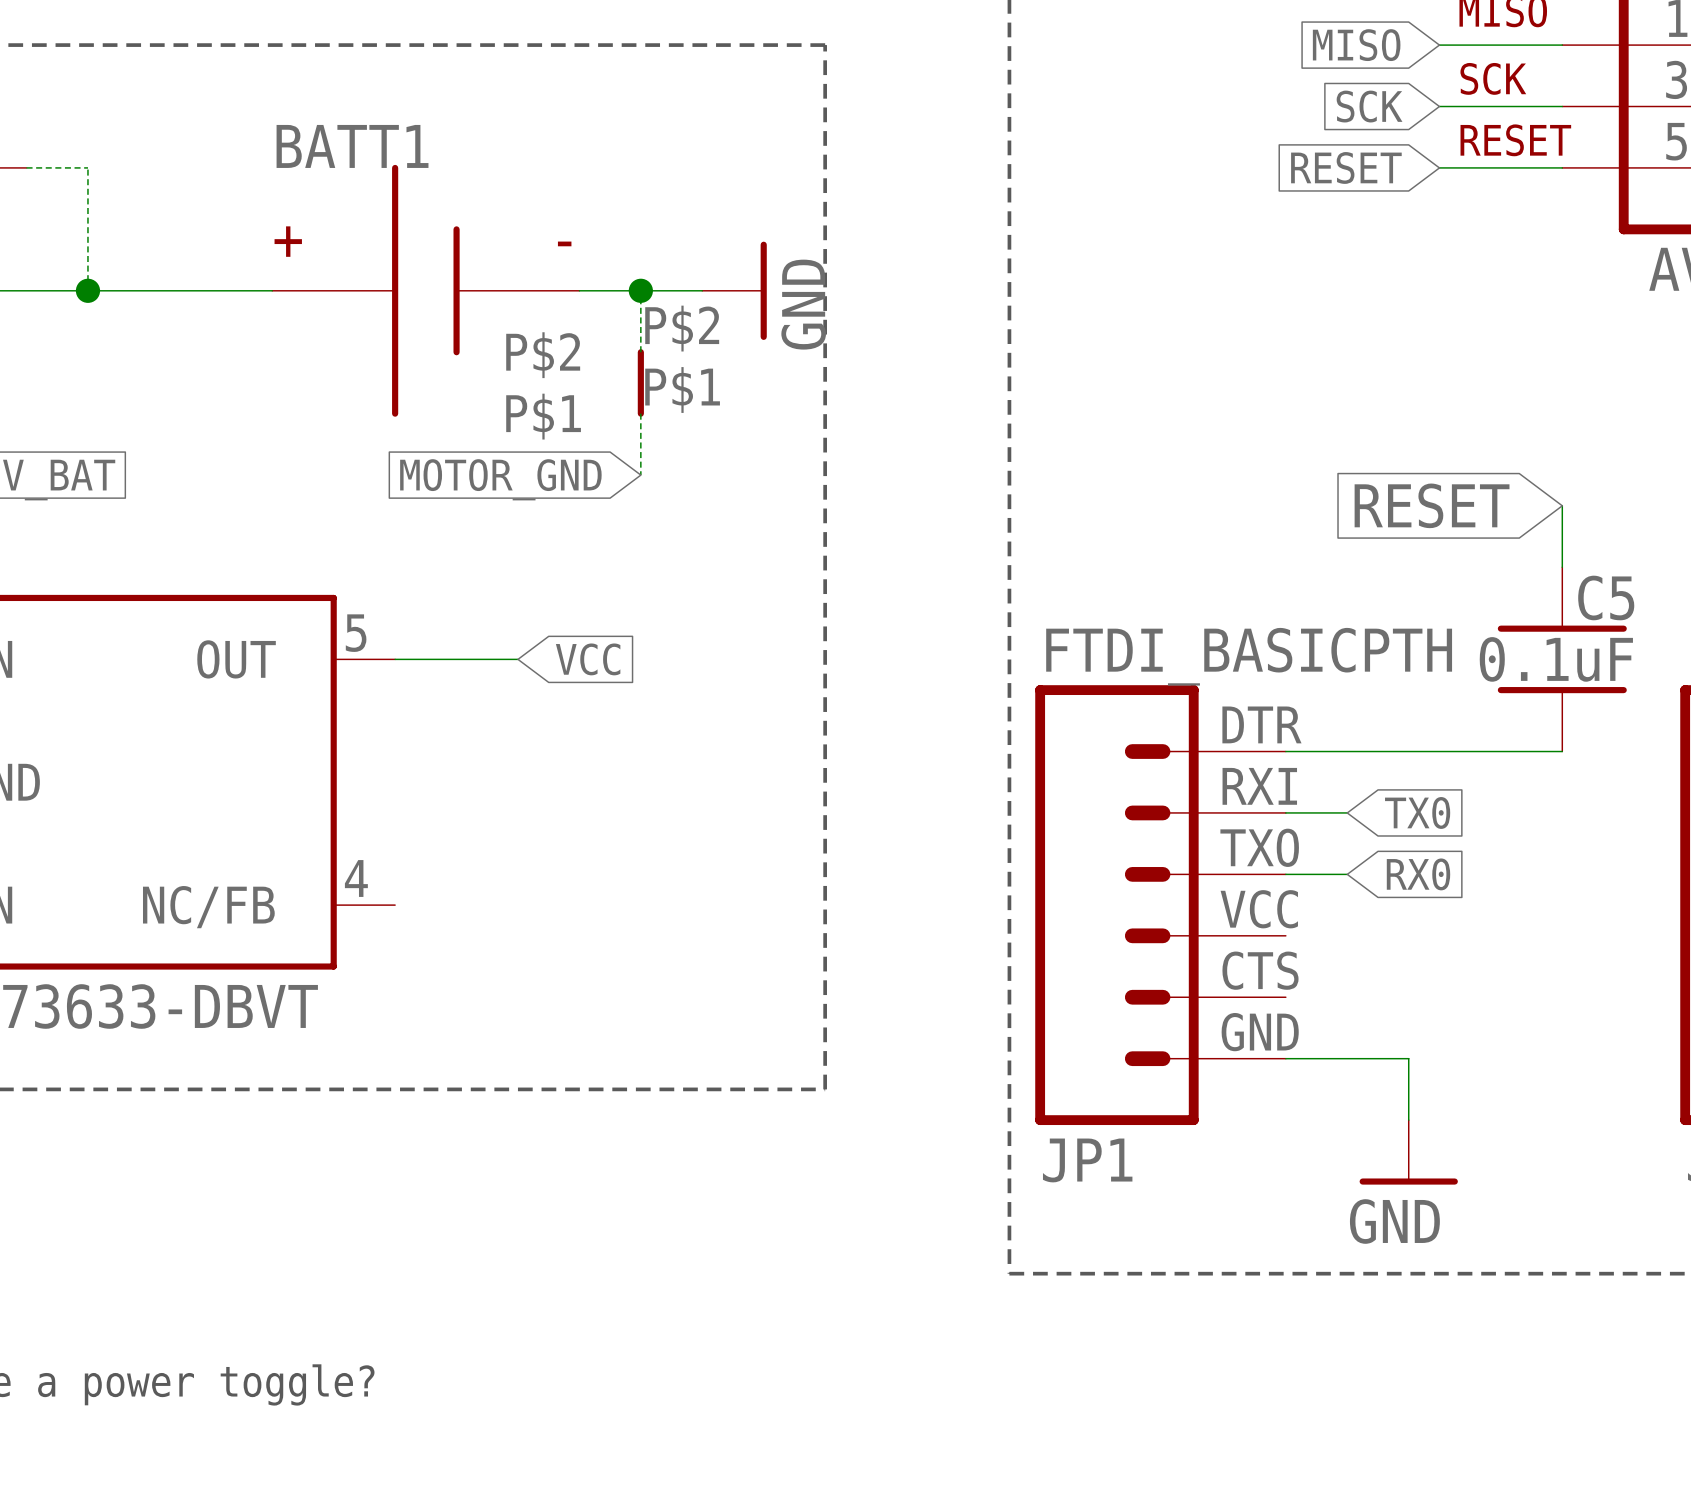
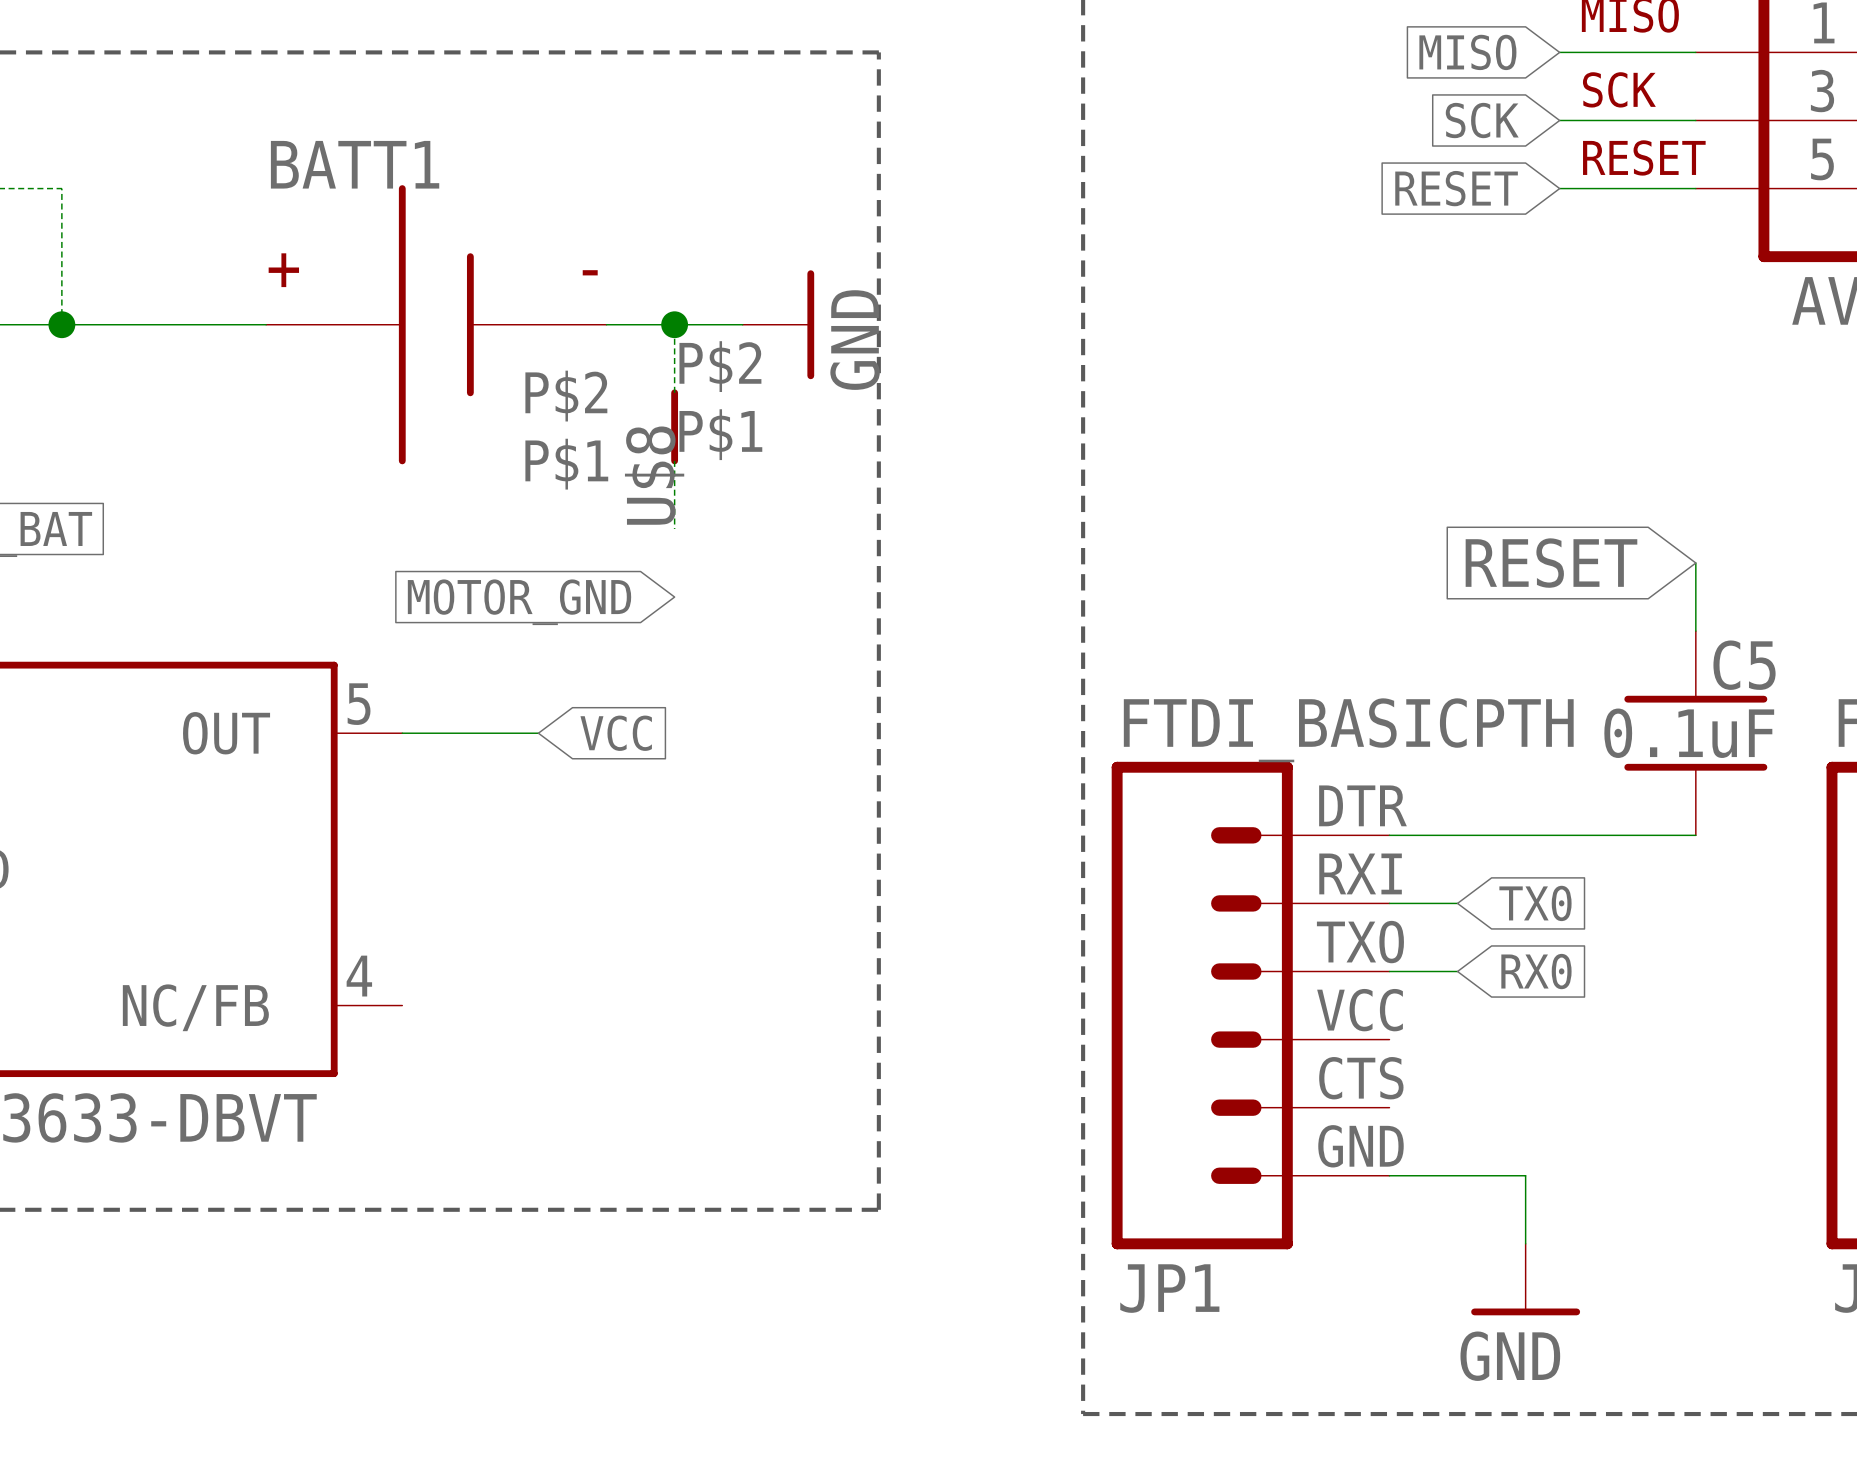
U$8 name: none -> U$8 (654, 475)
global label position: MOTOR_GND (500, 479) -> MOTOR_GND (519, 602)

